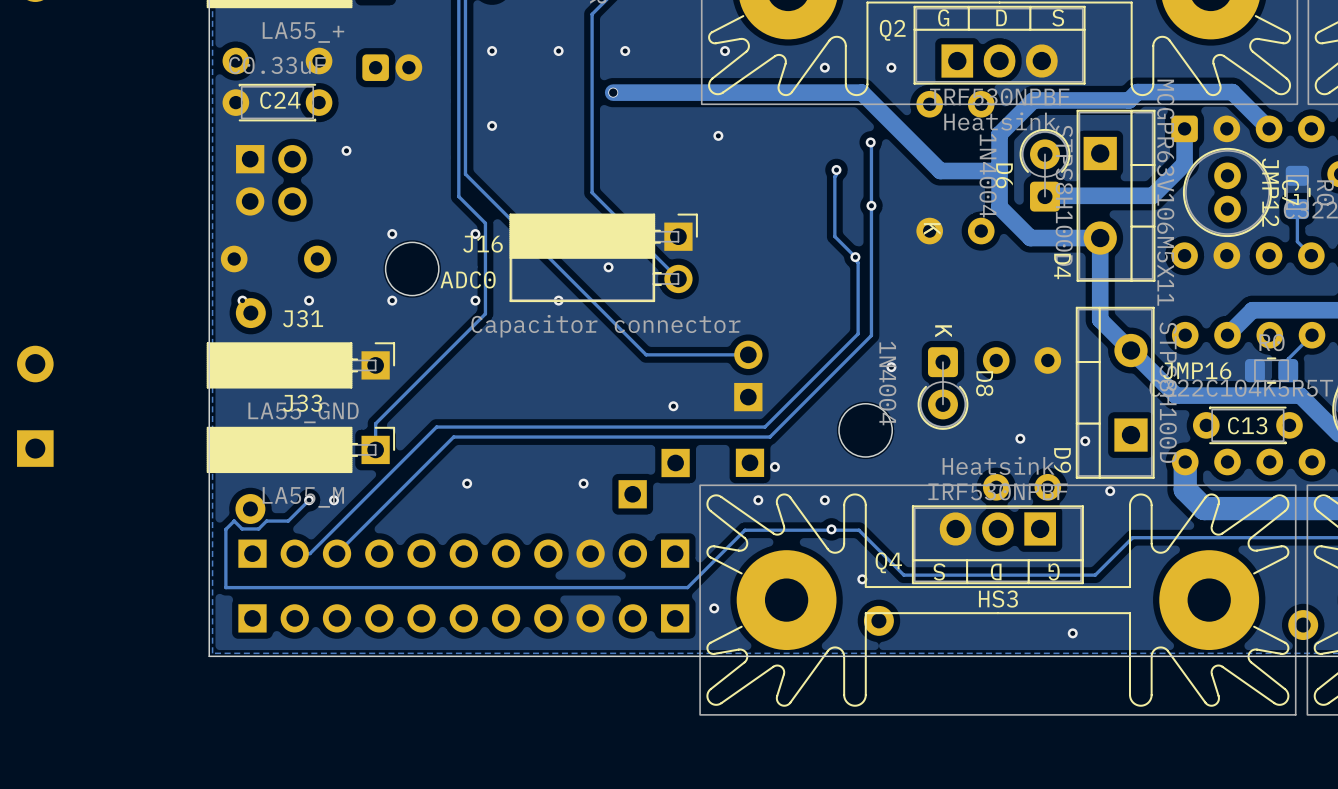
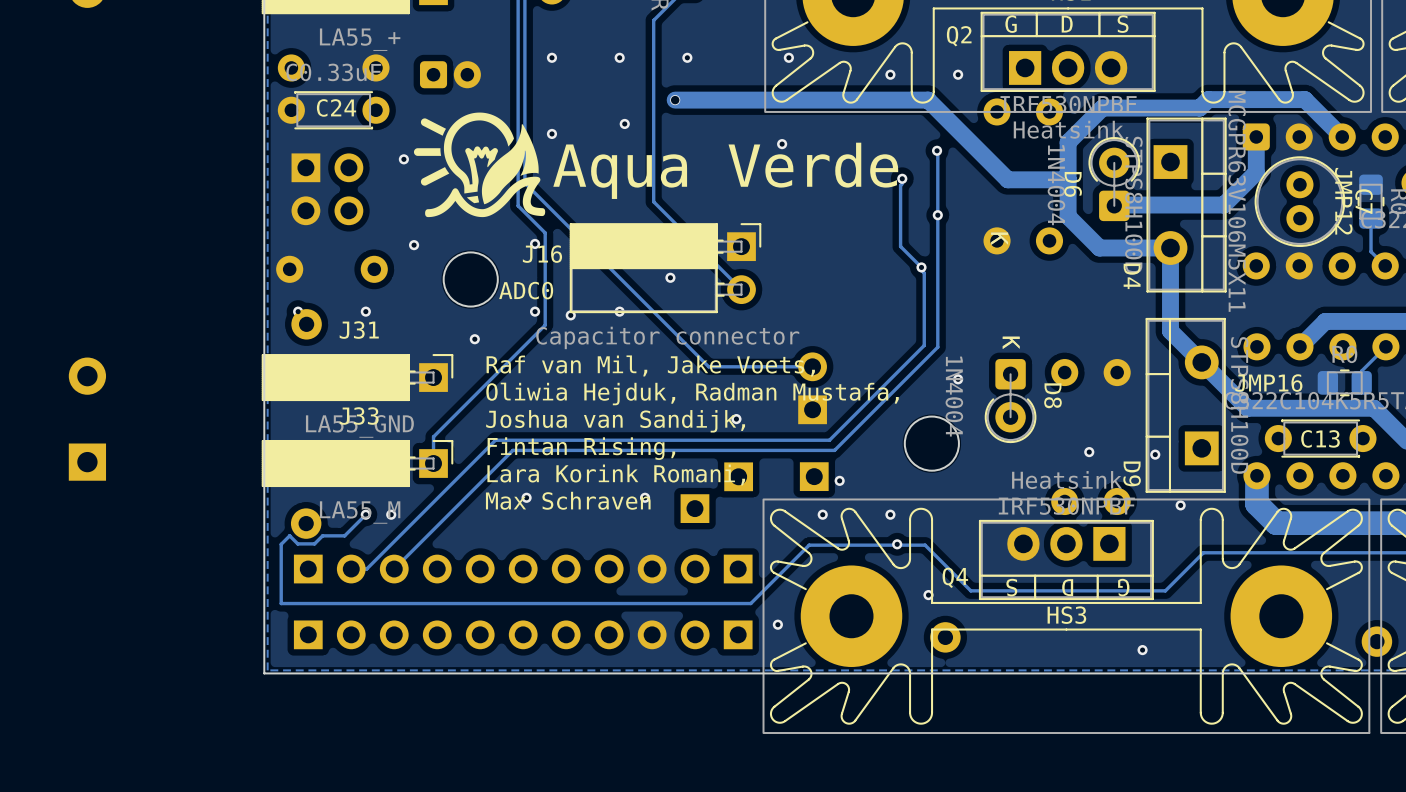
drawing: none -> [413, 112, 546, 218]
via: none -> (624, 123)
text: none -> Aqua Verde (725, 170)
via position: (392, 234) -> (414, 245)
via position: (392, 300) -> (474, 339)
via: none -> (570, 315)
text: none -> Raf van Mil, Jake Voets, (650, 365)
text: none -> Oliwia Hejduk, Radman Mustafa, (692, 393)
text: none -> Joshua van Sandijk, (615, 421)
text: none -> Fintan Rising, (581, 448)
text: none -> Lara Korink Romani, (616, 474)
text: none -> Max Schraven (568, 500)

